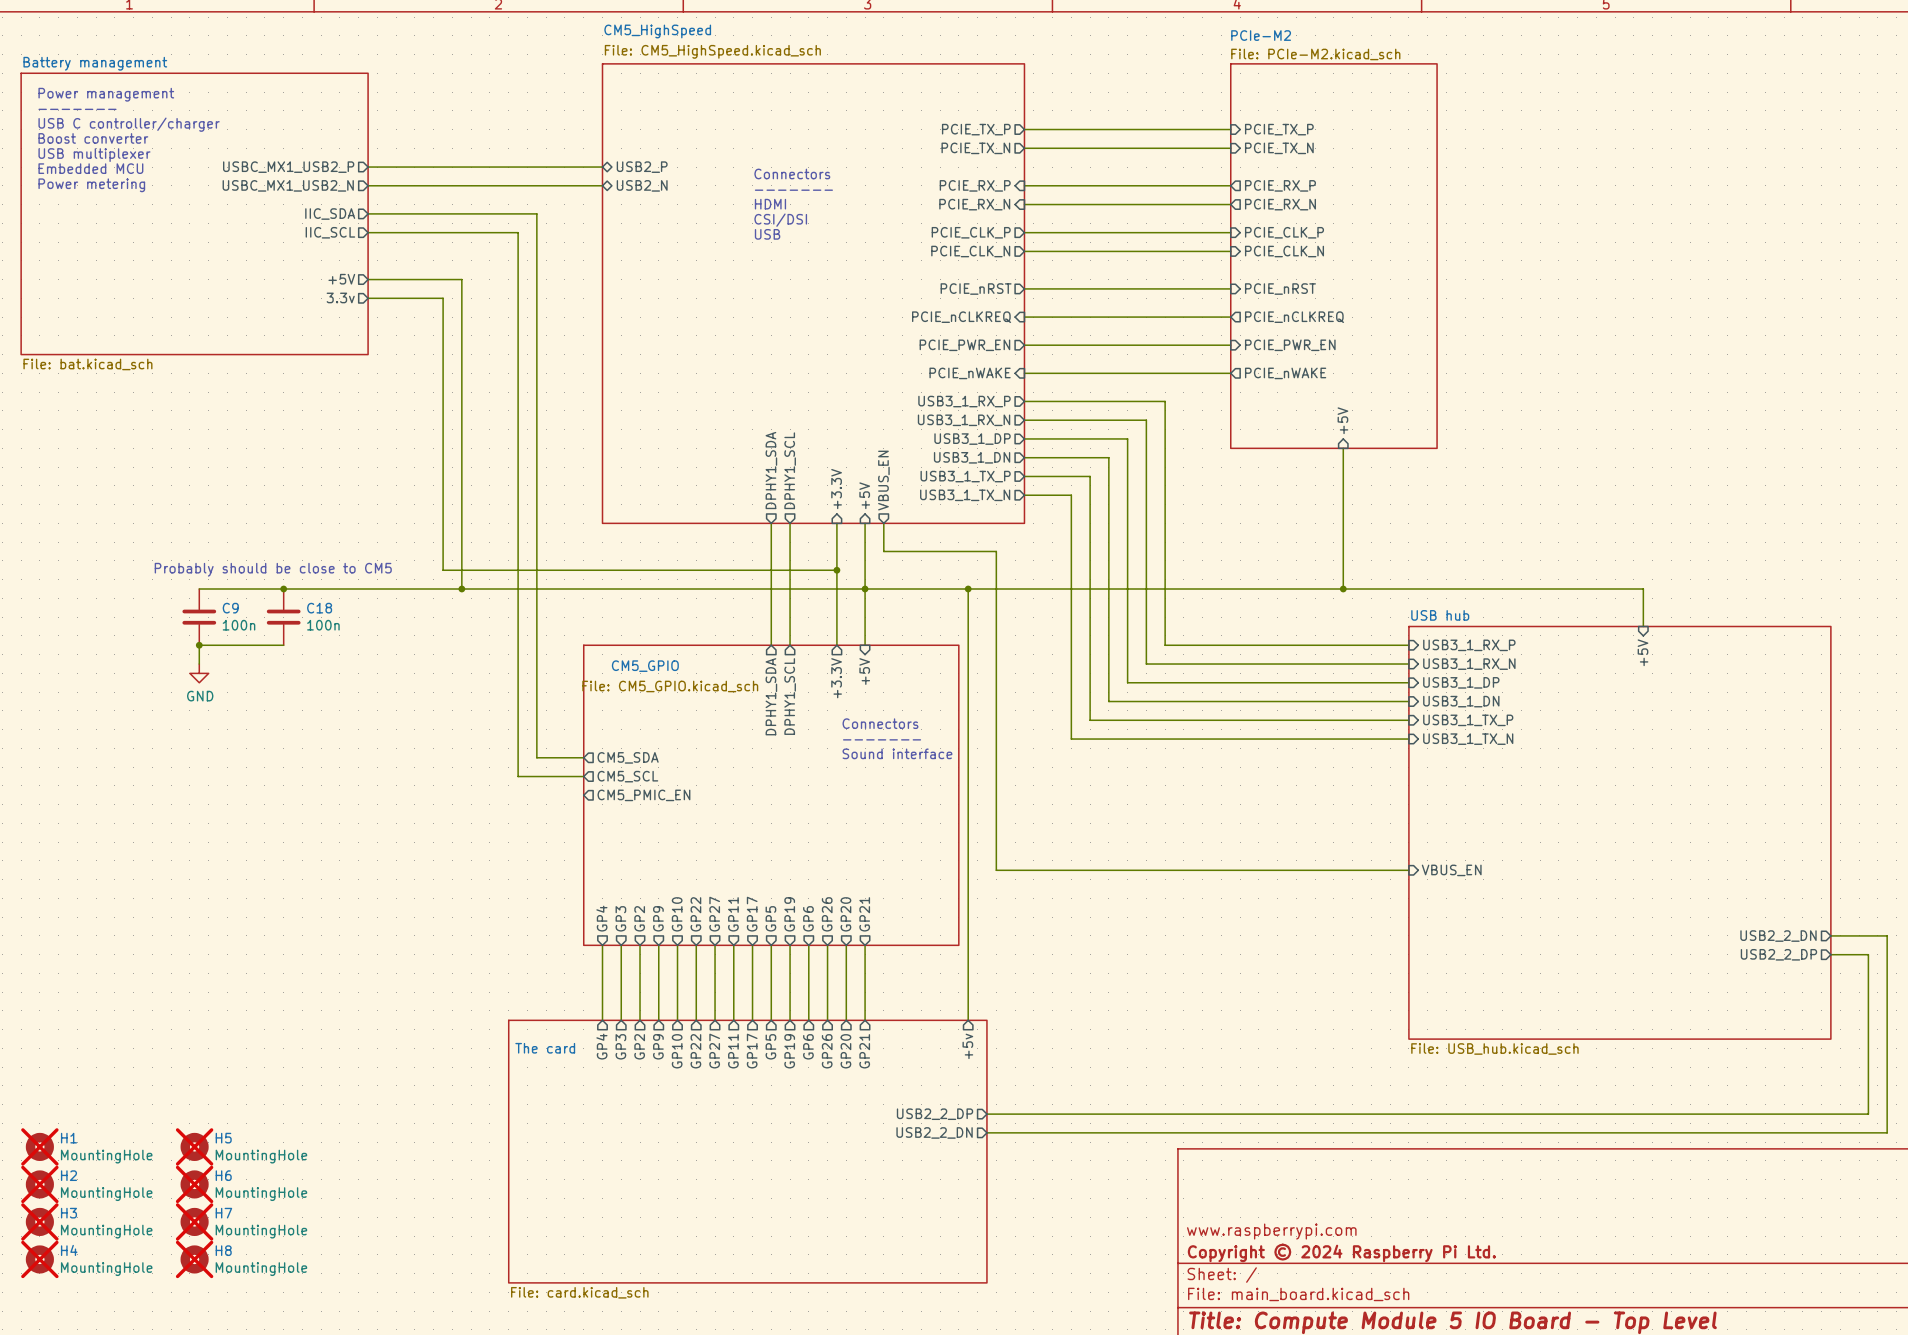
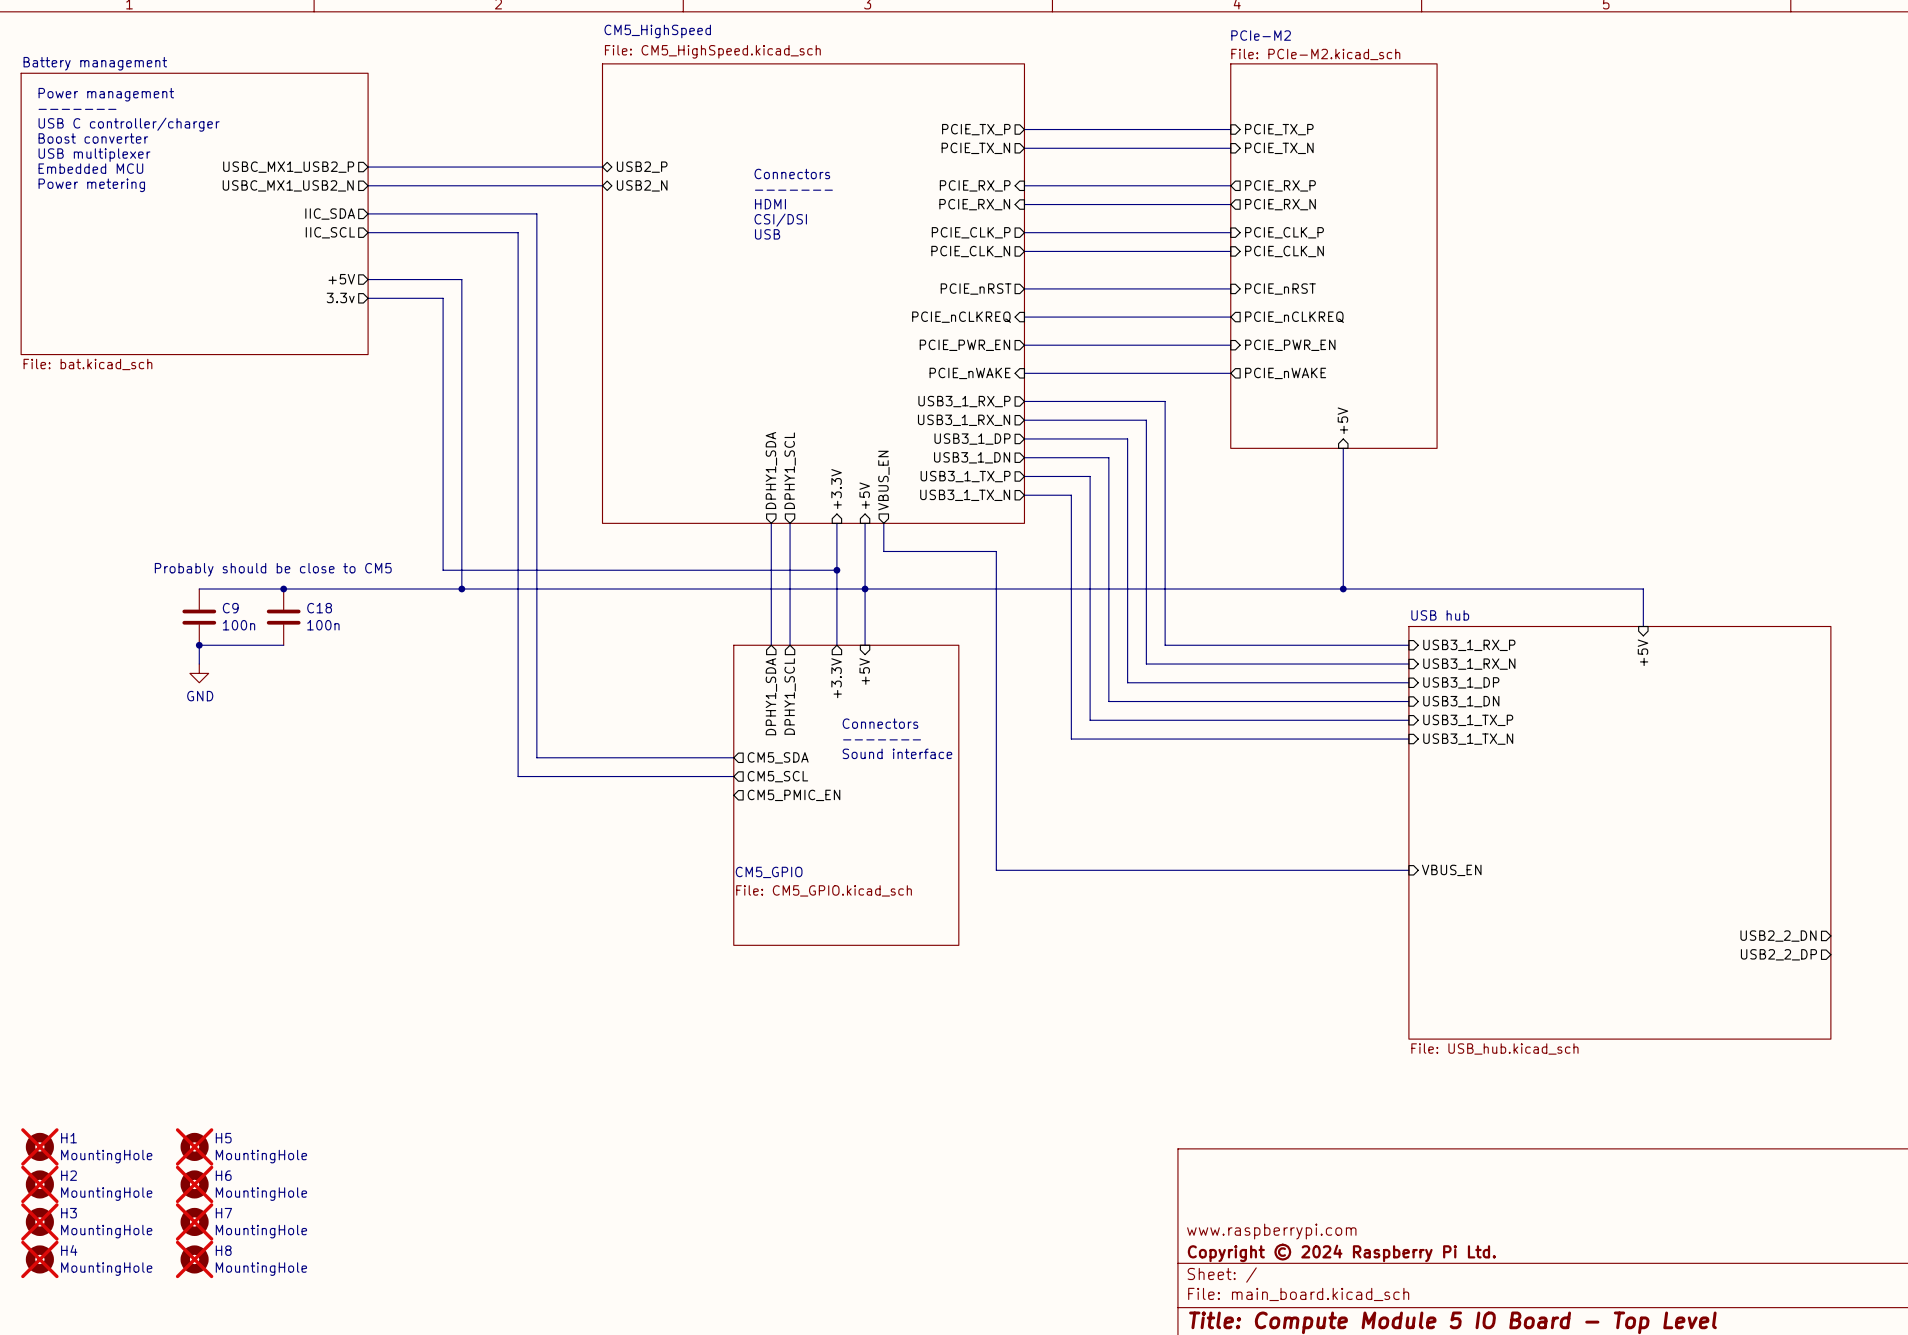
wire: (968, 588) (968, 1020) -> none
junction: (968, 588) -> none
sheet CM5_GPIO shape: [583, 644, 960, 946] -> [733, 644, 960, 946]
sheet CM5_GPIO name position: CM5_GPIO (645, 666) -> CM5_GPIO (769, 872)
sheet CM5_GPIO value position: File: CM5_GPIO.kicad_sch (670, 686) -> File: CM5_GPIO.kicad_sch (824, 890)
wire: none -> (583, 757) (733, 757)
sheet pin position: CM5_SDA (628, 757) -> CM5_SDA (778, 757)
wire: none -> (583, 776) (733, 776)
sheet pin position: CM5_SCL (627, 776) -> CM5_SCL (777, 776)
sheet pin position: CM5_PMIC_EN (643, 795) -> CM5_PMIC_EN (793, 795)
sheet pin: GP10 (677, 914) -> none
sheet pin: GP22 (695, 914) -> none
sheet pin: GP27 (714, 914) -> none
sheet pin: GP11 (733, 914) -> none
sheet pin: GP17 (752, 914) -> none
sheet pin: GP19 (789, 914) -> none
sheet pin: GP26 (827, 914) -> none
sheet pin: GP20 (845, 914) -> none
sheet pin: GP21 (864, 914) -> none
sheet pin: GP4 (601, 918) -> none
sheet pin: GP3 (620, 918) -> none
sheet pin: GP2 (639, 918) -> none
sheet pin: GP9 (658, 918) -> none
sheet pin: GP5 (770, 918) -> none
sheet pin: GP6 (808, 918) -> none
wire: (1830, 935) (1887, 935) (1887, 1132) (986, 1132) -> none
wire: (602, 945) (602, 1020) -> none
wire: (621, 945) (621, 1020) -> none
wire: (640, 945) (640, 1020) -> none
wire: (658, 945) (658, 1020) -> none
wire: (677, 945) (677, 1020) -> none
wire: (696, 945) (696, 1020) -> none
wire: (715, 945) (715, 1020) -> none
wire: (733, 945) (733, 1020) -> none
wire: (752, 945) (752, 1020) -> none
wire: (771, 945) (771, 1020) -> none
wire: (790, 945) (790, 1020) -> none
wire: (808, 945) (808, 1020) -> none
wire: (827, 945) (827, 1020) -> none
wire: (846, 945) (846, 1020) -> none
wire: (865, 945) (865, 1020) -> none
wire: (1830, 954) (1868, 954) (1868, 1114) (986, 1114) -> none
sheet pin: GP4 (601, 1046) -> none
sheet pin: GP3 (620, 1046) -> none
sheet pin: GP2 (639, 1046) -> none
sheet pin: GP9 (658, 1046) -> none
sheet pin: GP5 (770, 1046) -> none
sheet pin: GP6 (808, 1046) -> none
sheet pin: +5v (967, 1046) -> none
sheet pin: GP10 (677, 1051) -> none
sheet pin: GP22 (695, 1051) -> none
sheet pin: GP27 (714, 1051) -> none
sheet pin: GP11 (733, 1051) -> none
sheet pin: GP17 (752, 1051) -> none
sheet pin: GP19 (789, 1051) -> none
sheet pin: GP26 (827, 1051) -> none
sheet pin: GP20 (845, 1051) -> none
sheet pin: GP21 (864, 1051) -> none
sheet pin: USB2_2_DP (935, 1114) -> none
sheet pin: USB2_2_DN (934, 1132) -> none
sheet The card: File: card.kicad_sch (747, 1151) -> none

